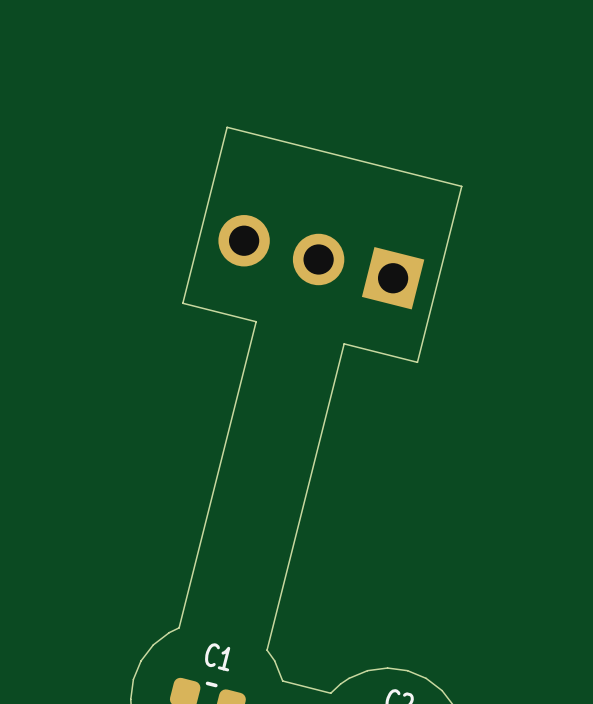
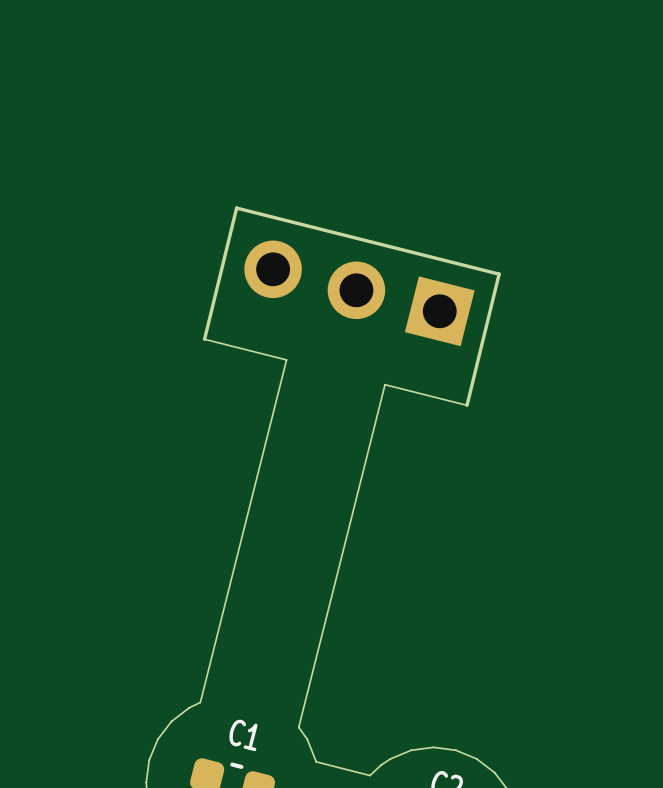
board edge: (182, 303) (227, 127) (461, 186) (417, 362) -> (204, 339) (236, 208) (499, 274) (467, 405)

